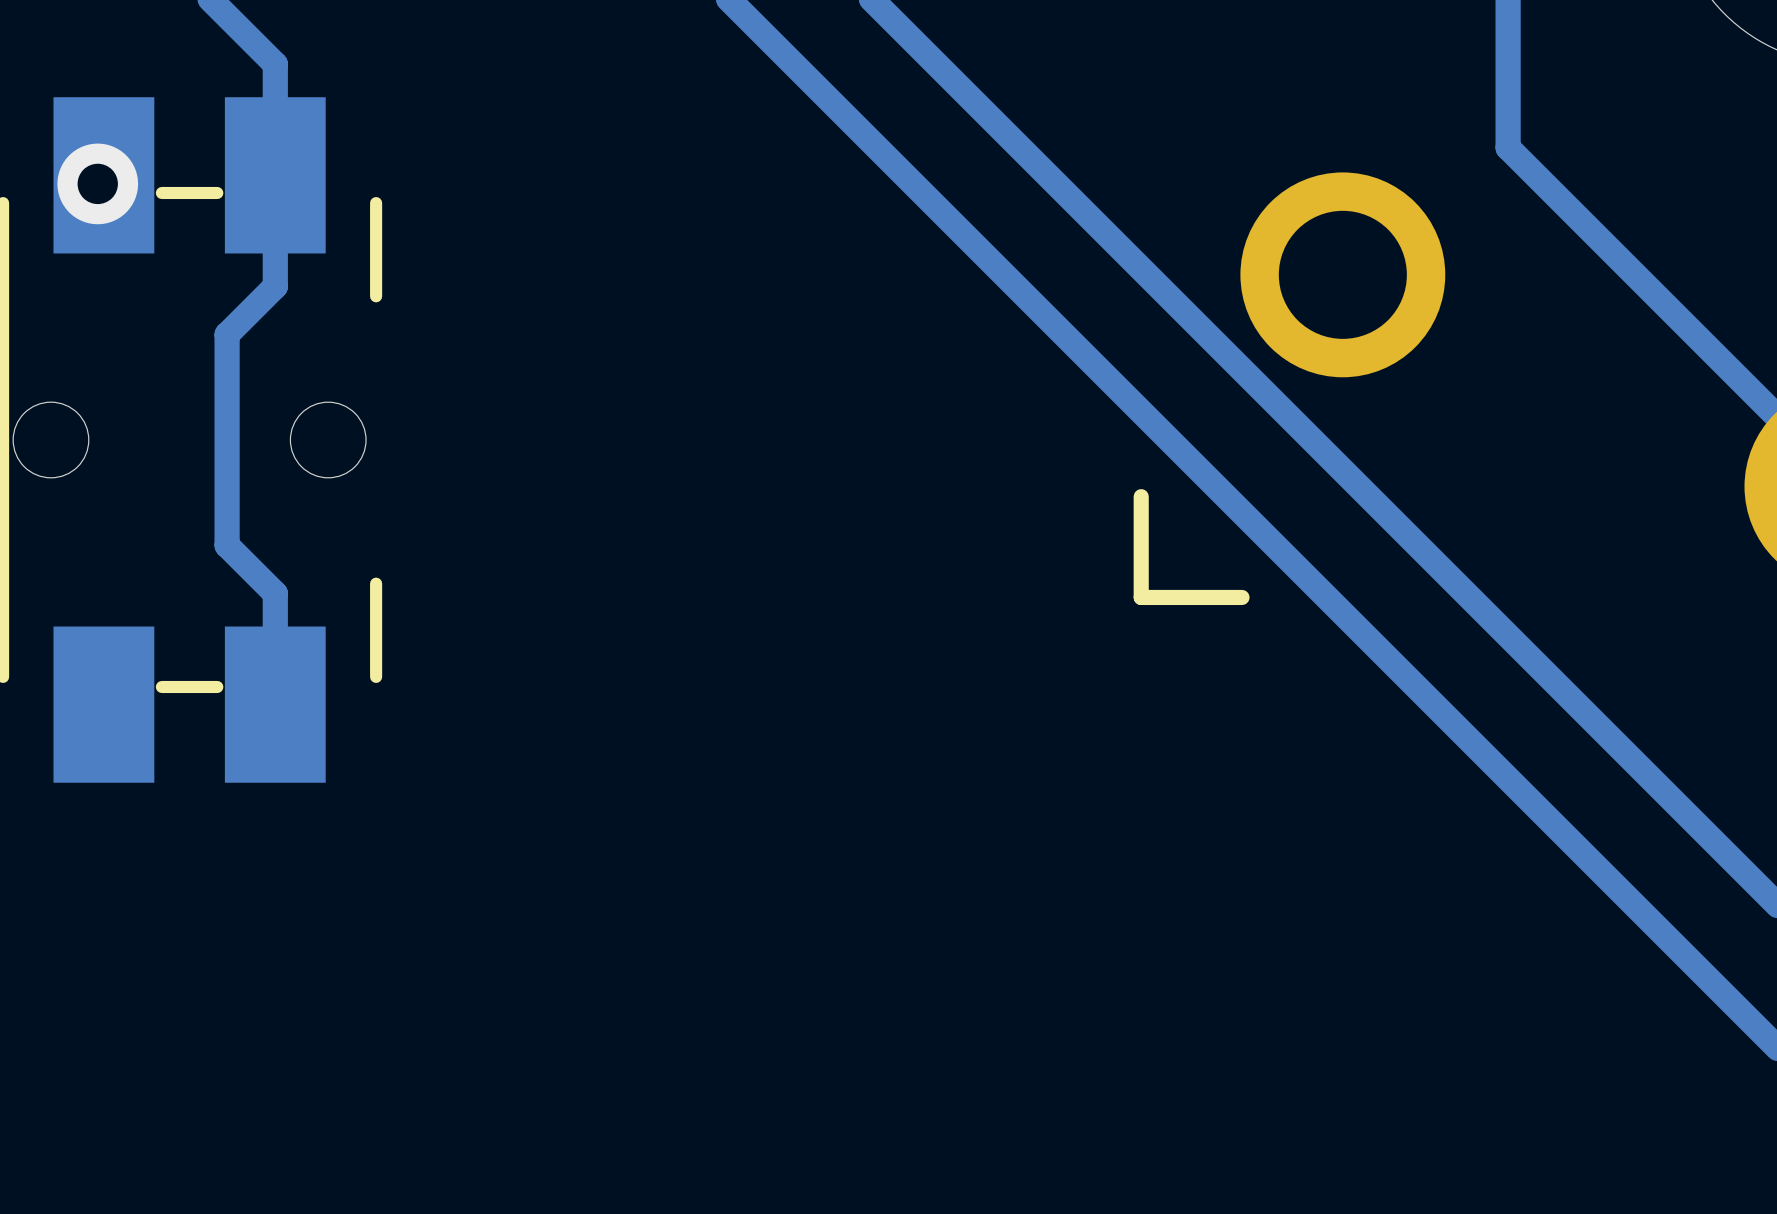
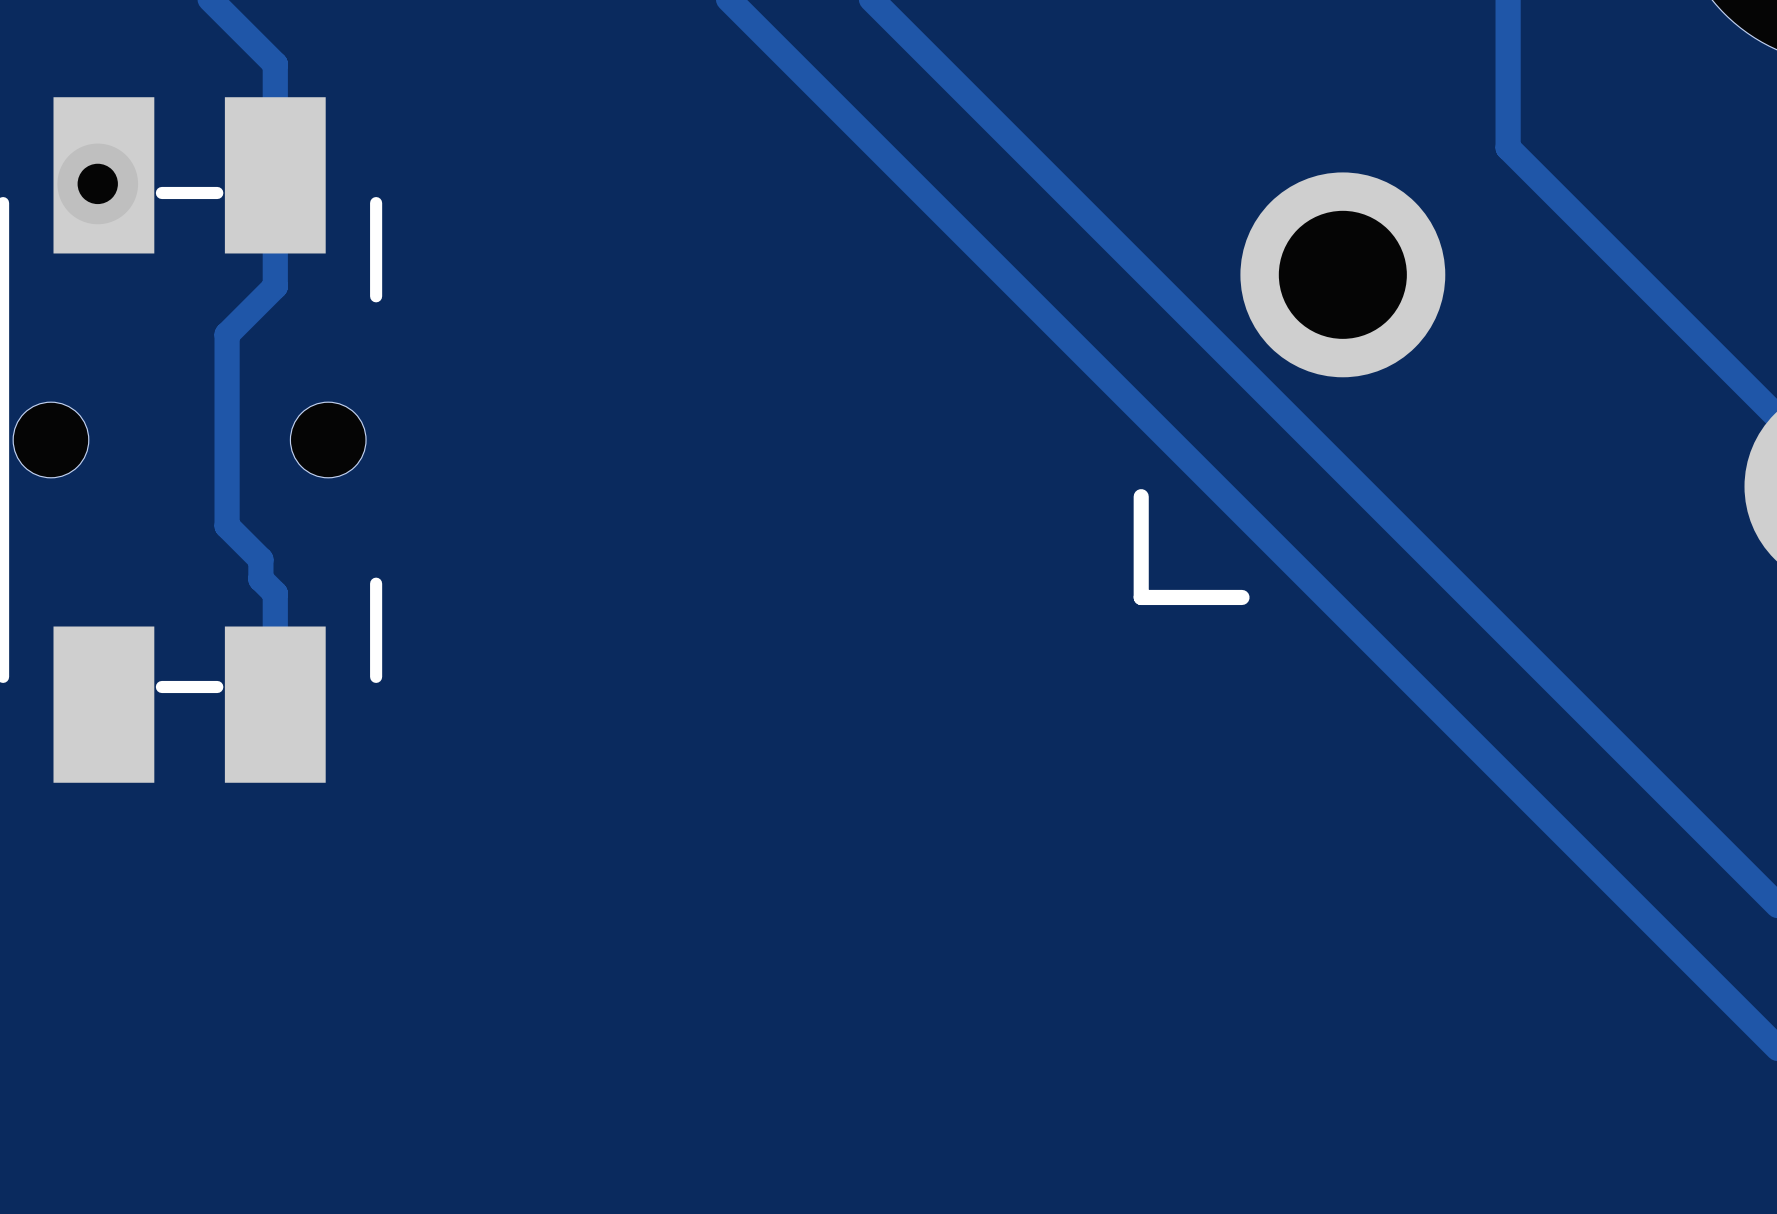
track: (227, 525) (227, 545) (260, 579) -> (227, 525) (260, 559) (260, 579)

